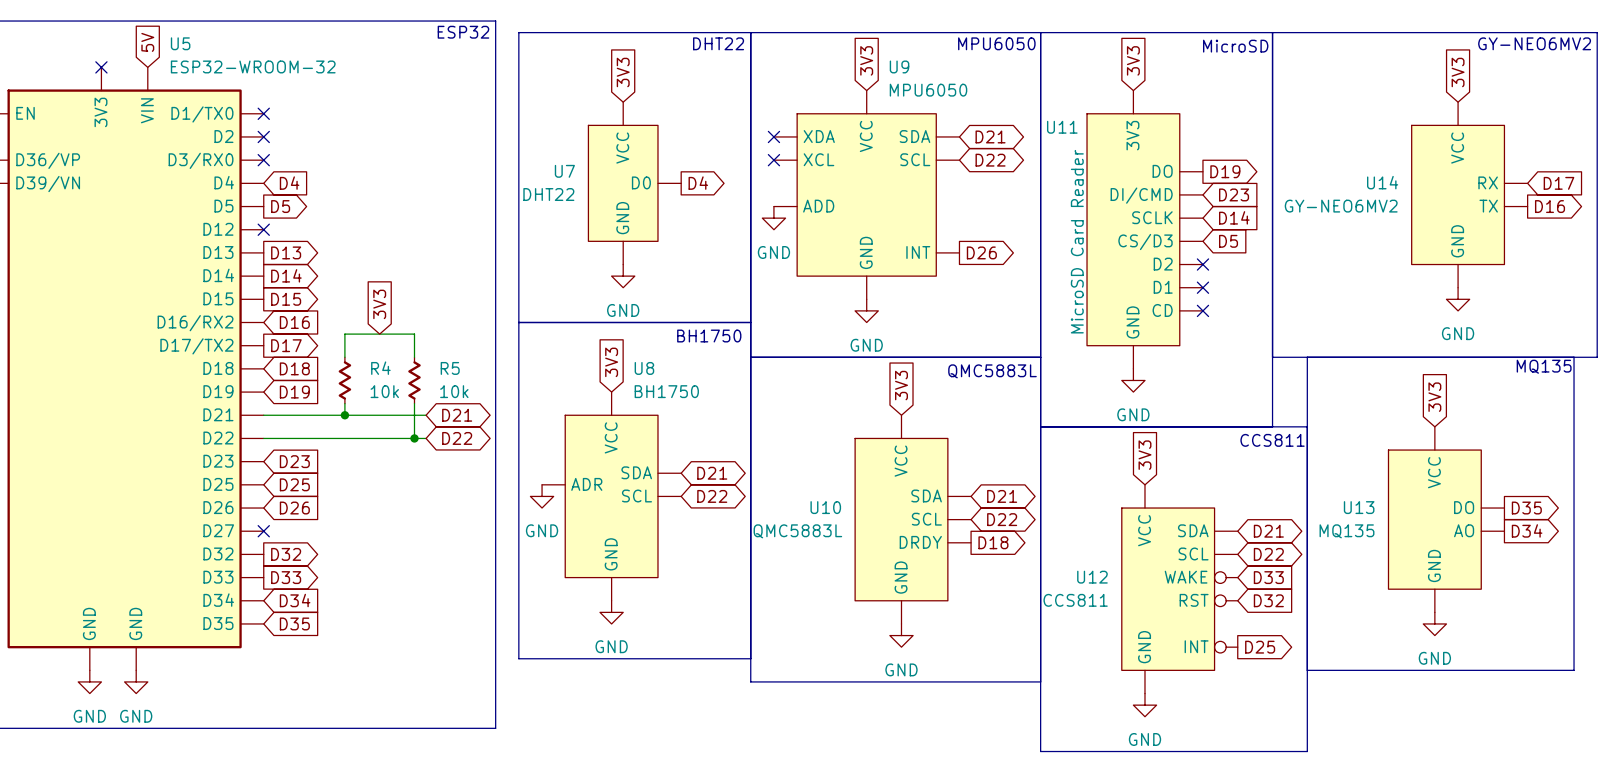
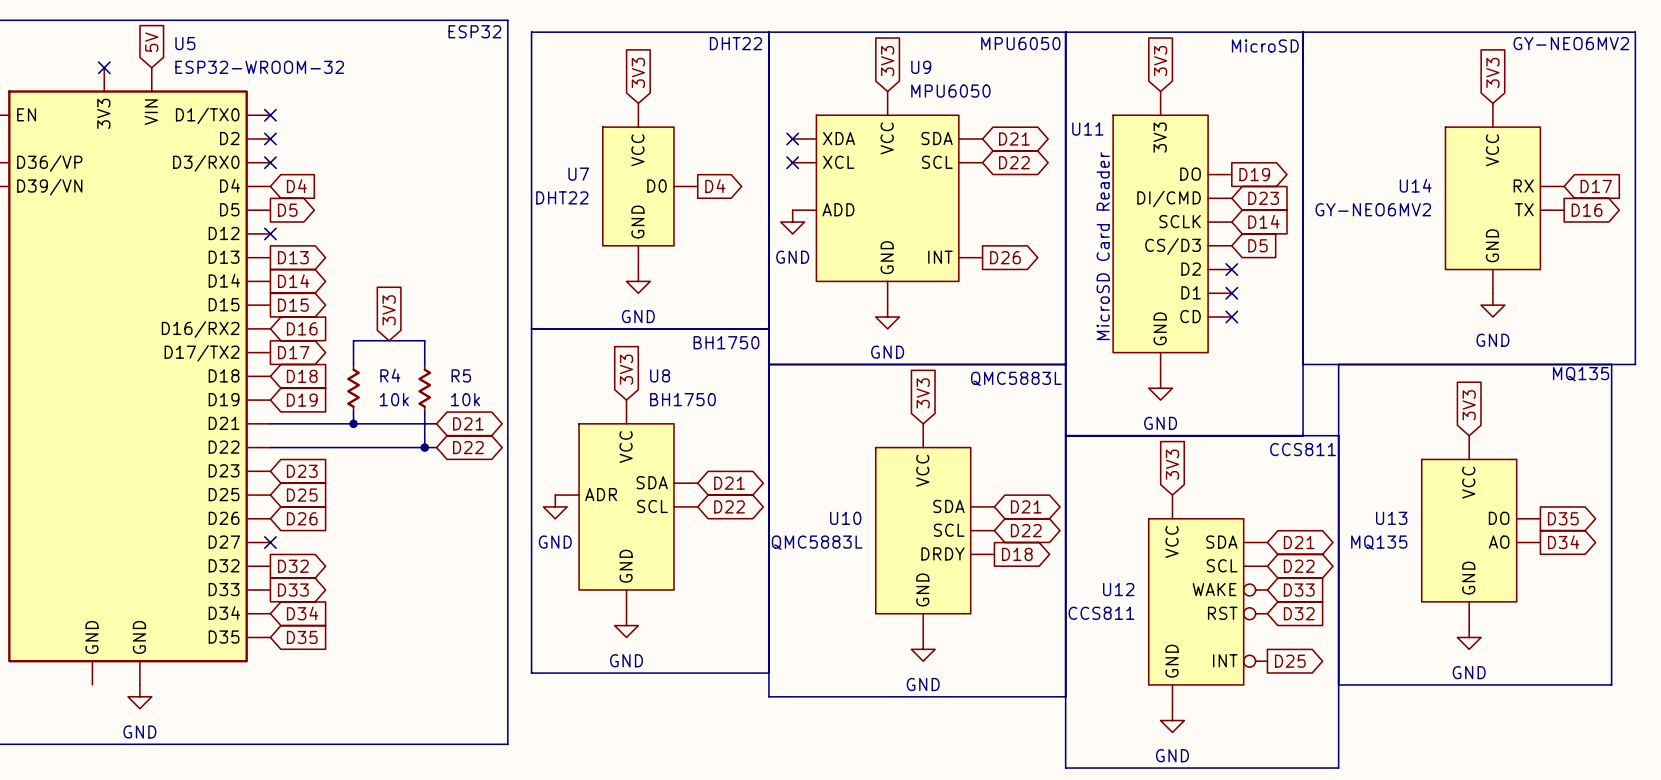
power symbol: GND (89, 681) -> none

